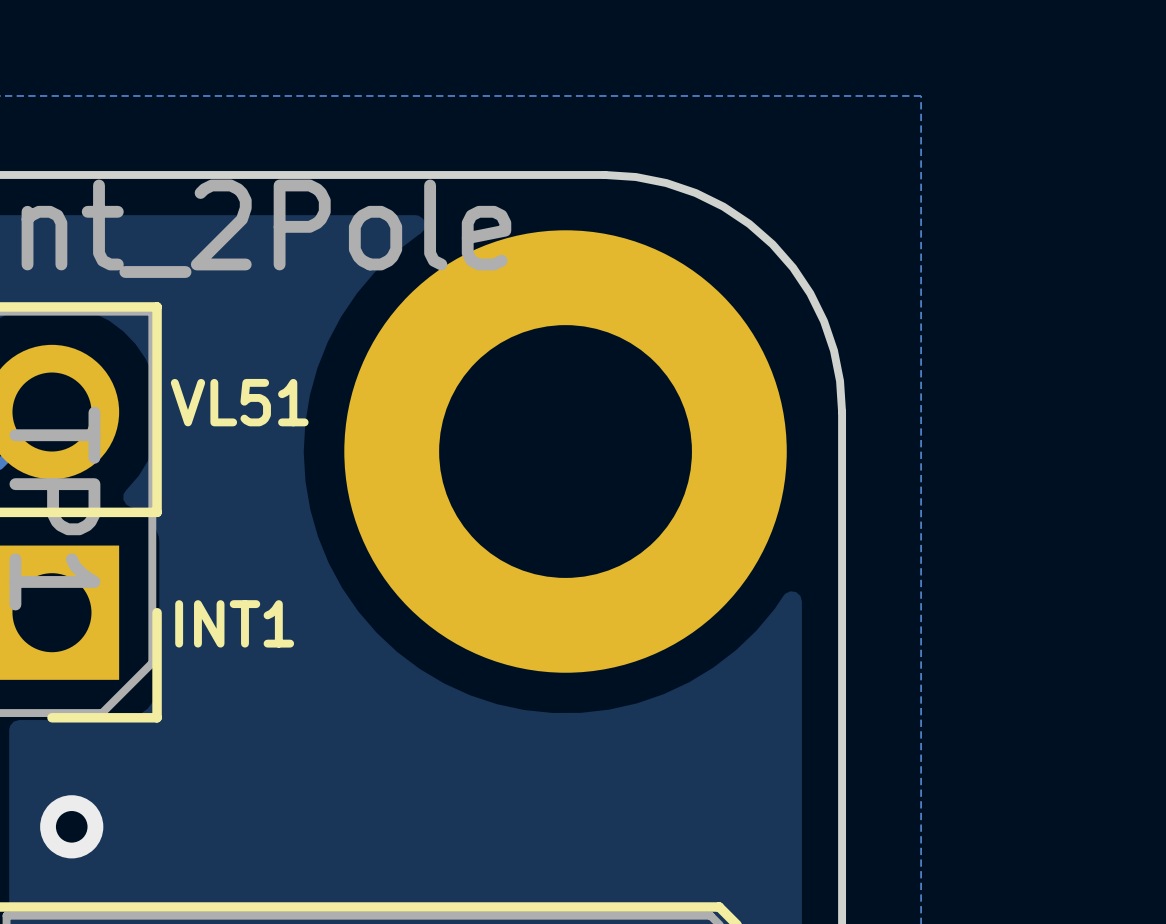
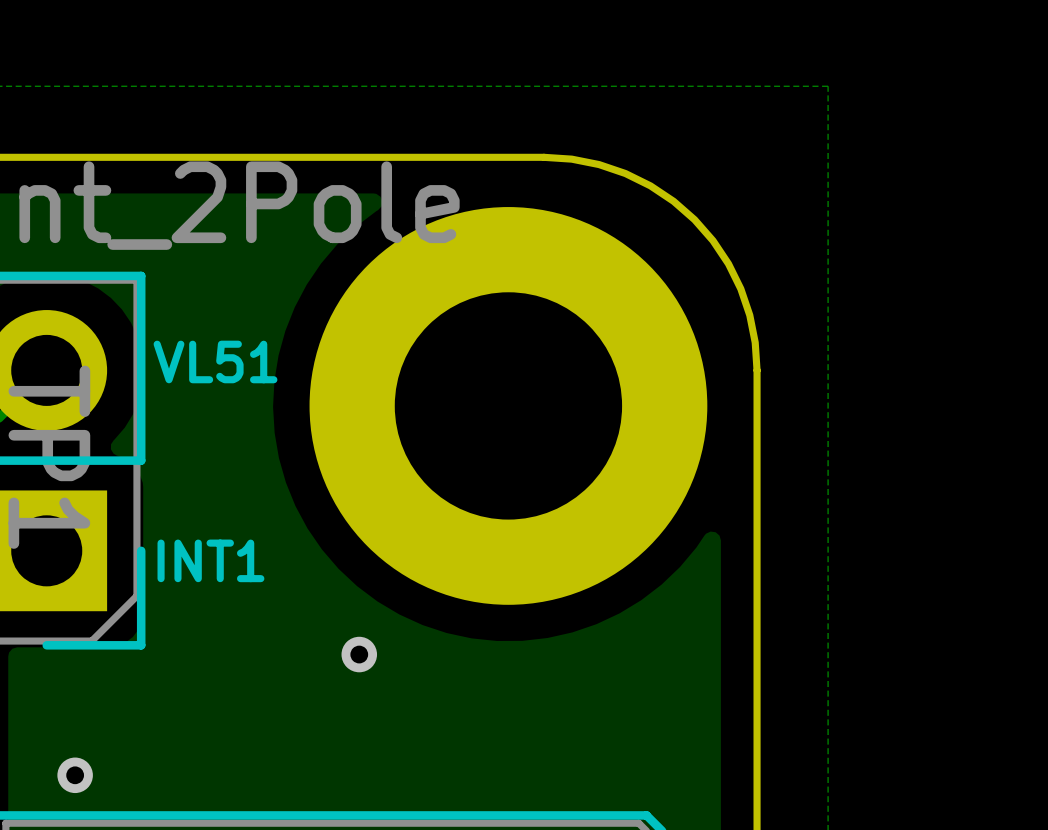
via: none -> (359, 654)
via size: [40, 795, 104, 859] -> [57, 757, 93, 794]

